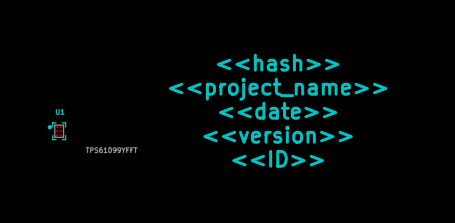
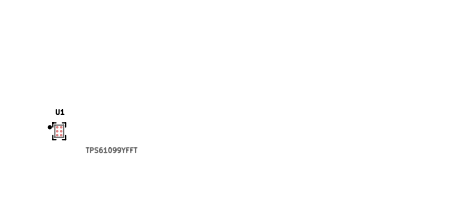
text: <<hash>> (278, 62) -> none
text: <<project_name>> (278, 89) -> none
text: <<date>> (278, 110) -> none
text: <<version>> (278, 134) -> none
text: <<ID>> (278, 158) -> none

